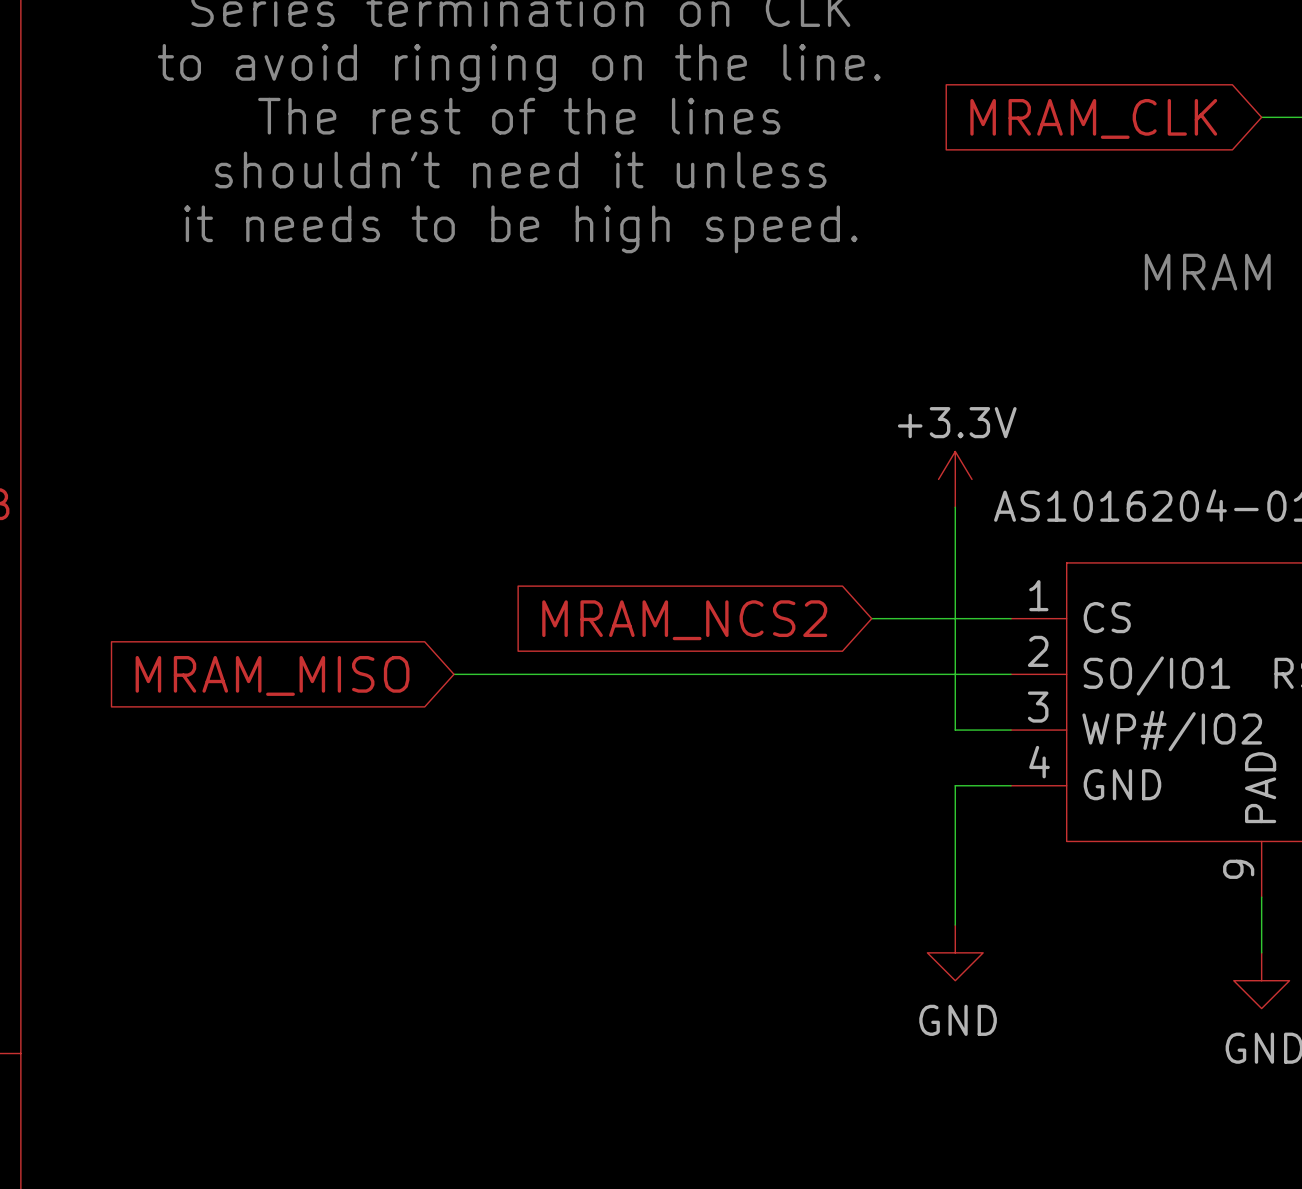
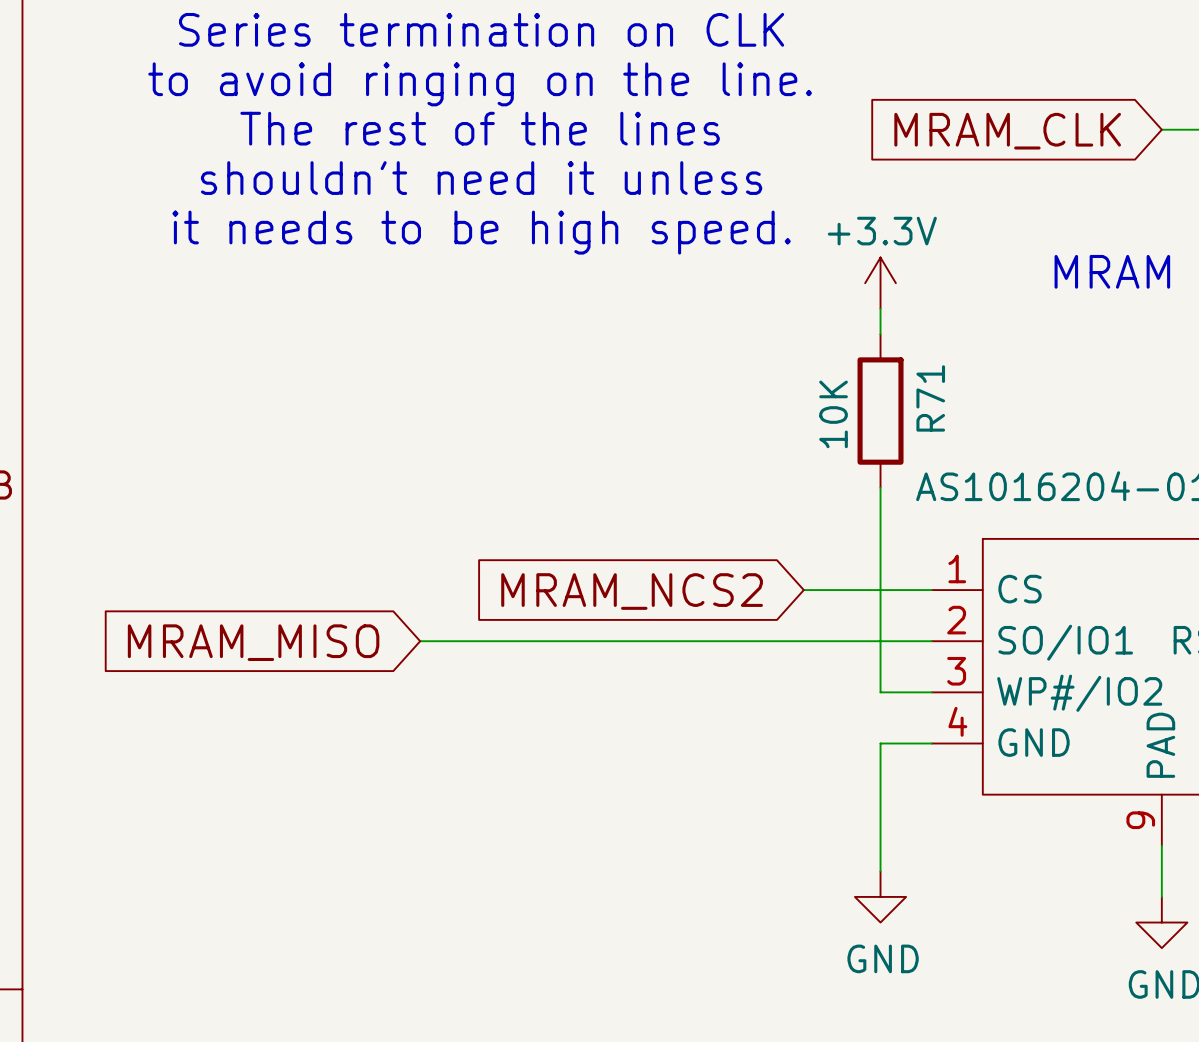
wire: none -> (880, 308) (880, 334)
R71: none -> 10K (880, 411)
power symbol position: +3.3V (955, 479) -> +3.3V (880, 283)

